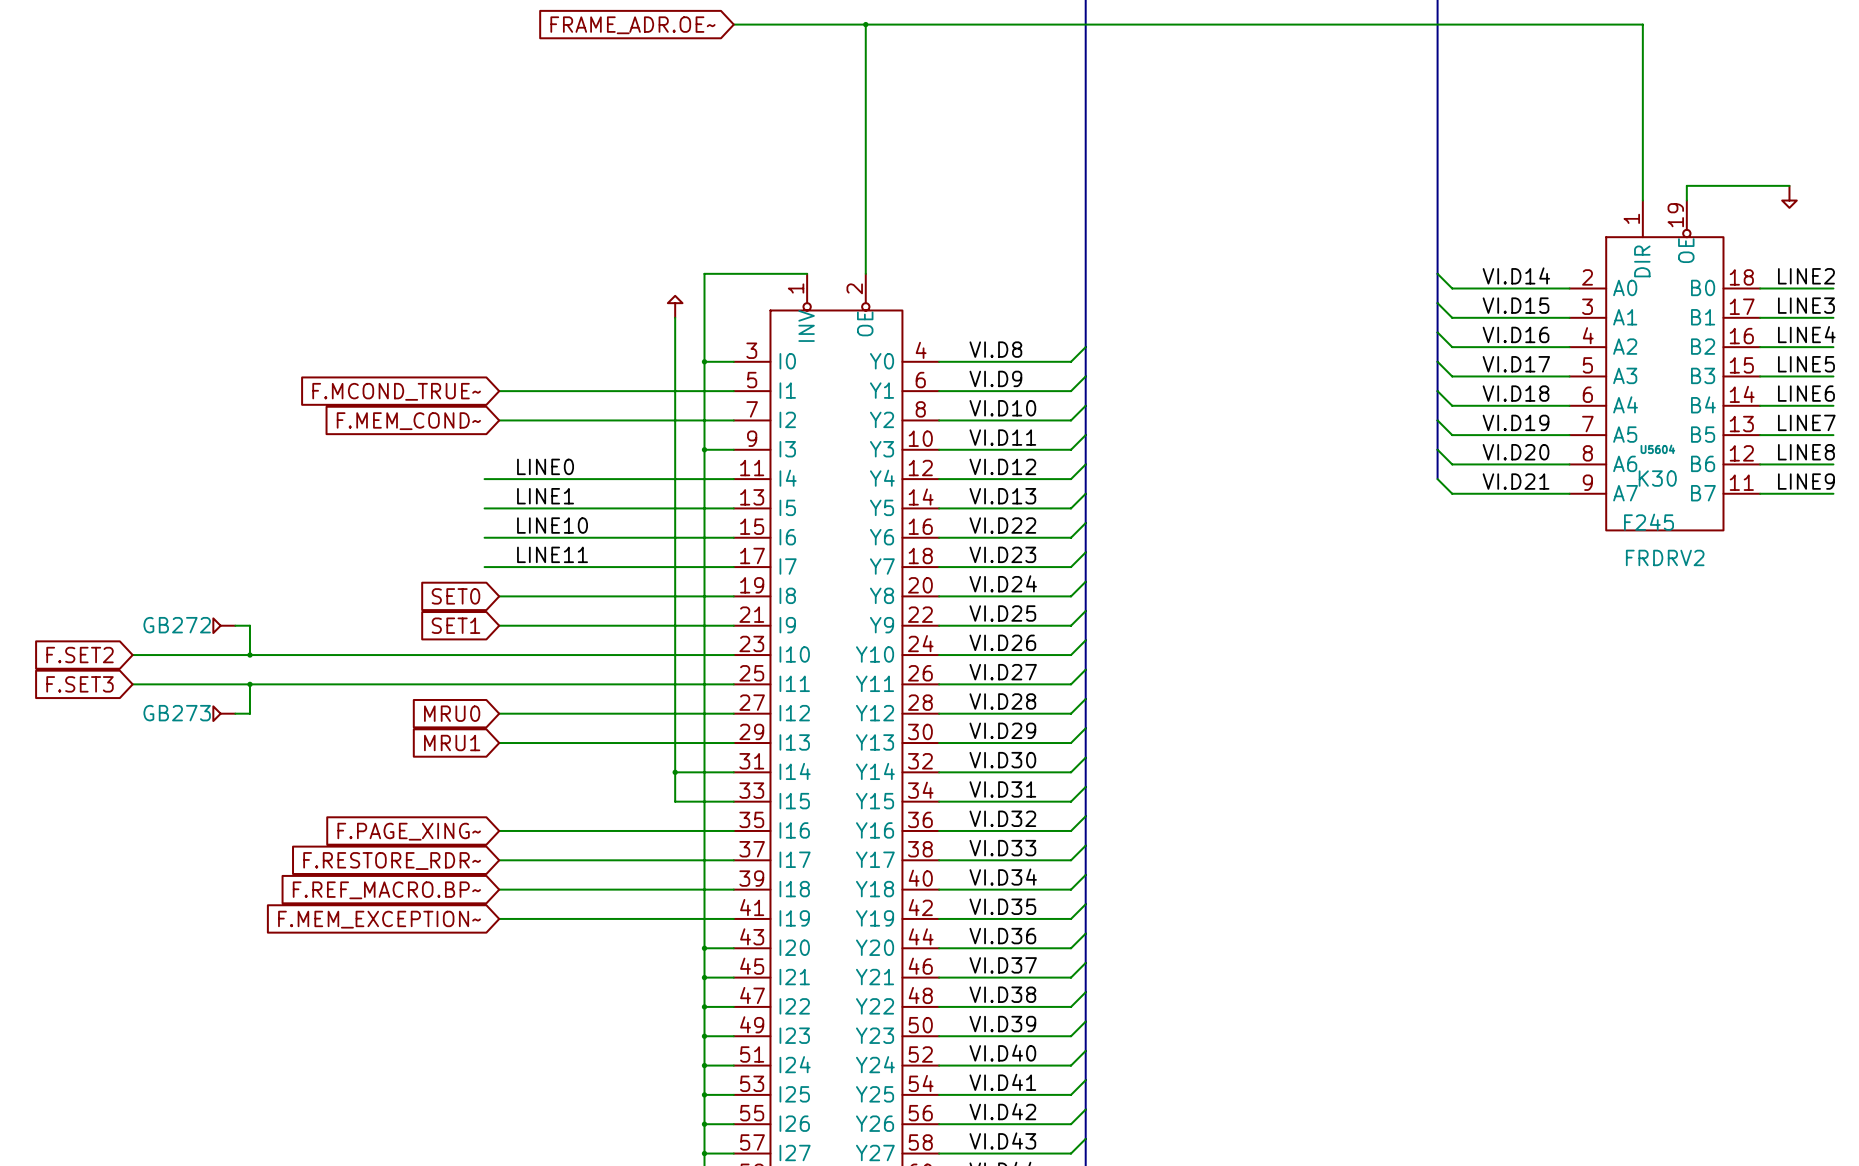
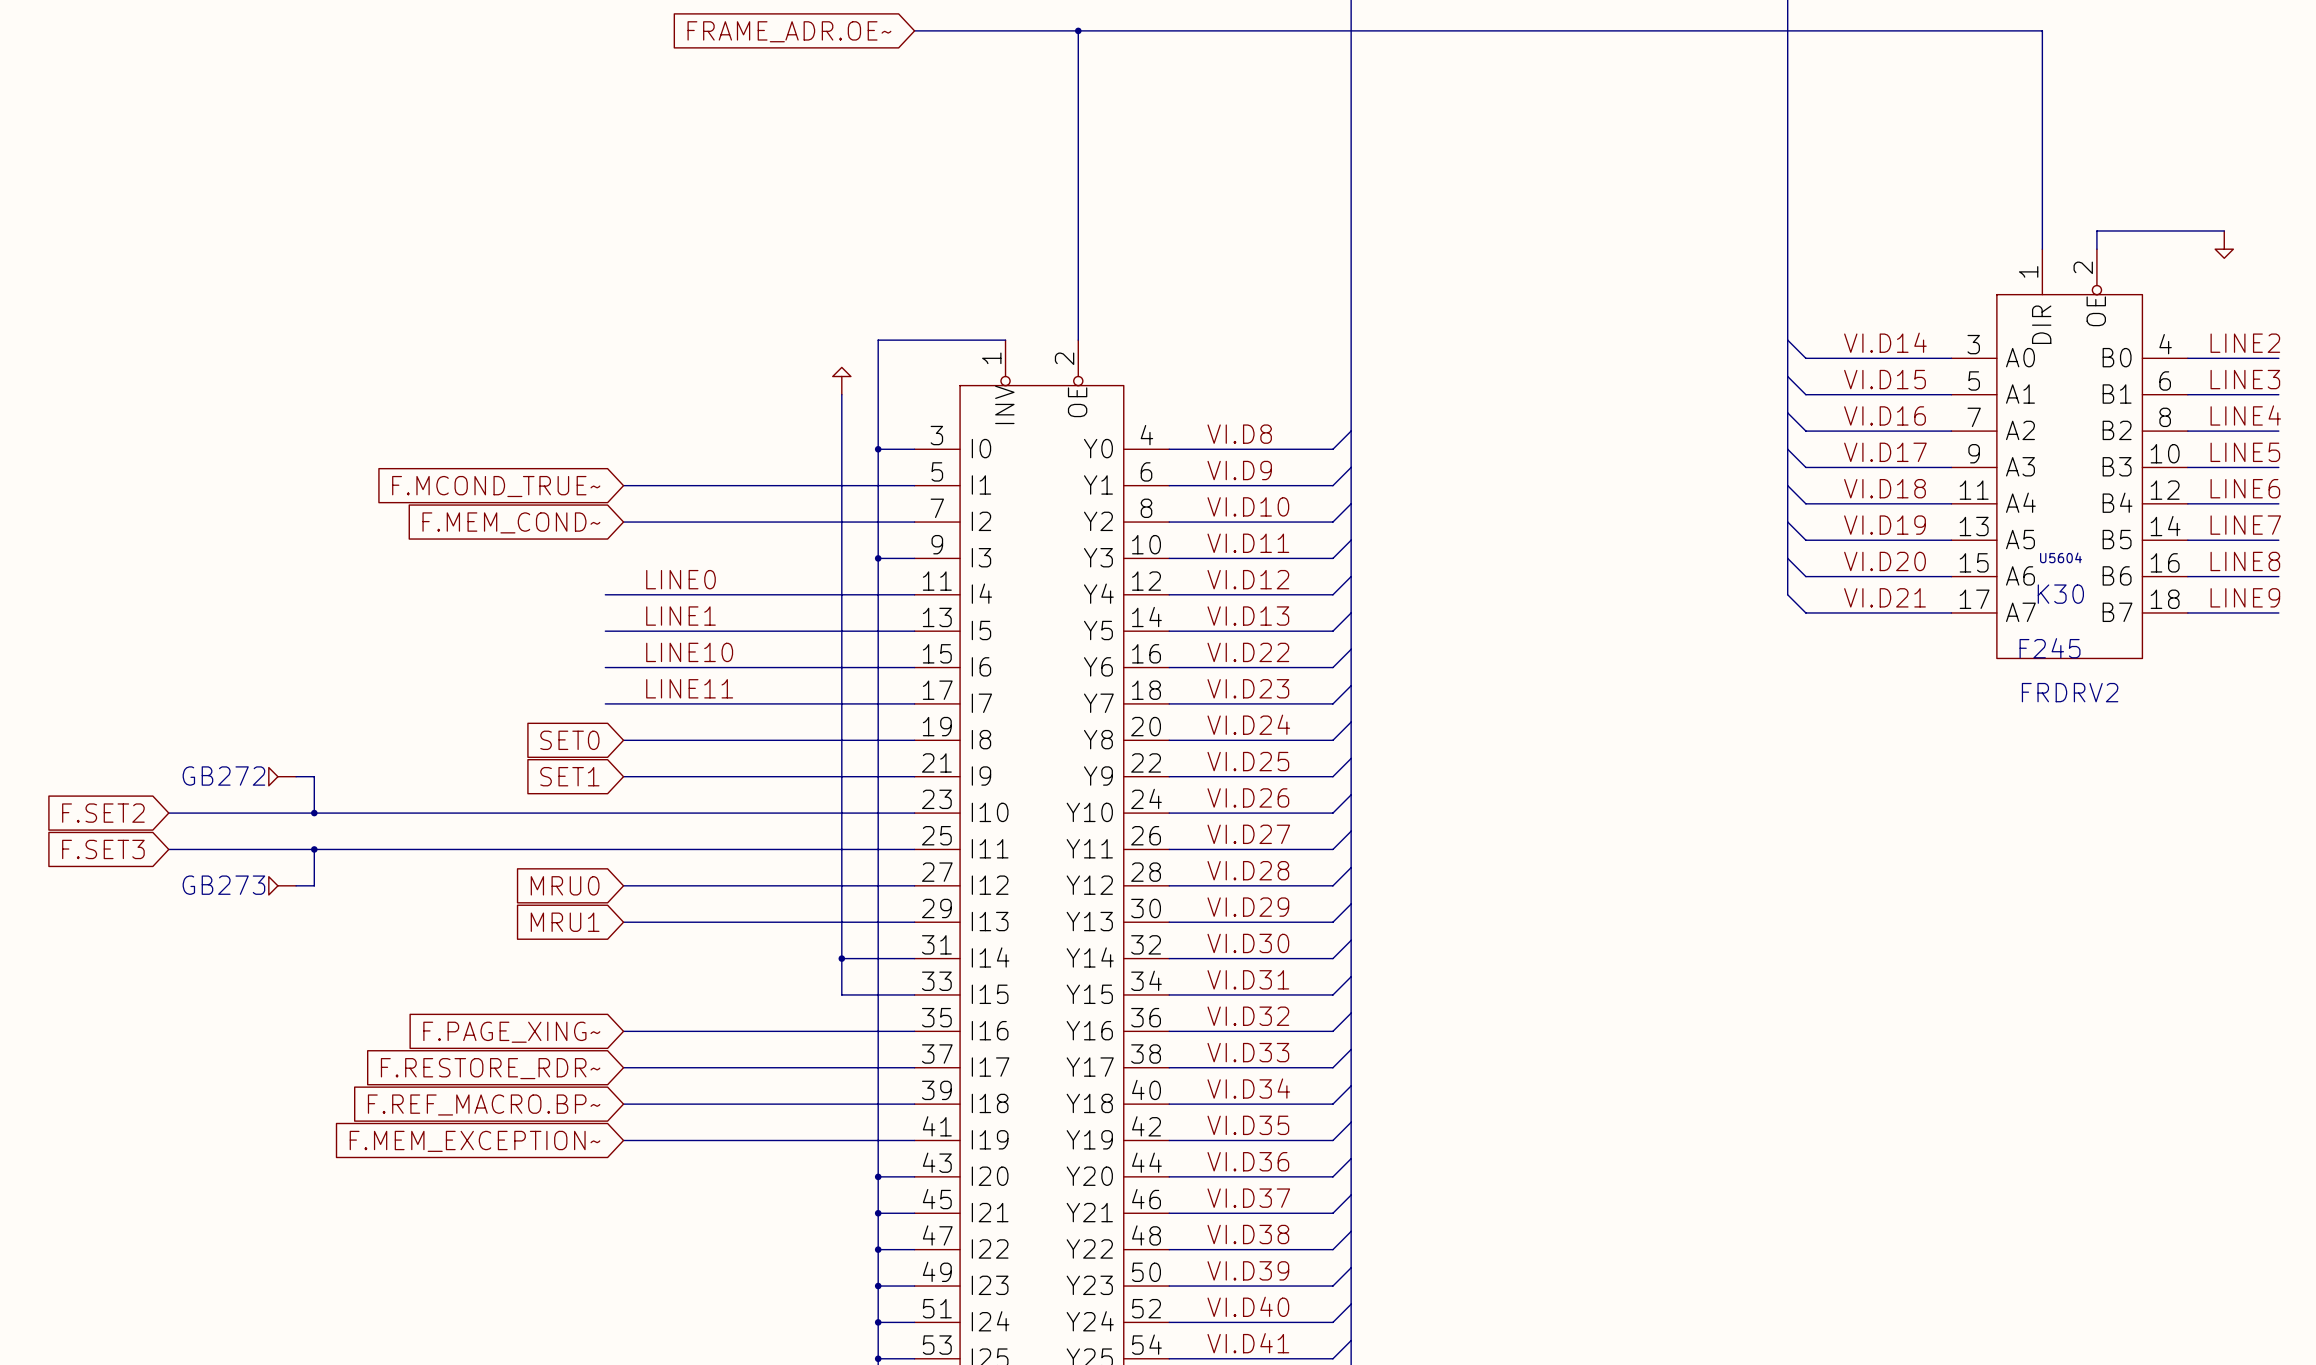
U5604 symbol: [1569, 200, 1761, 531] -> [1951, 249, 2188, 659]

